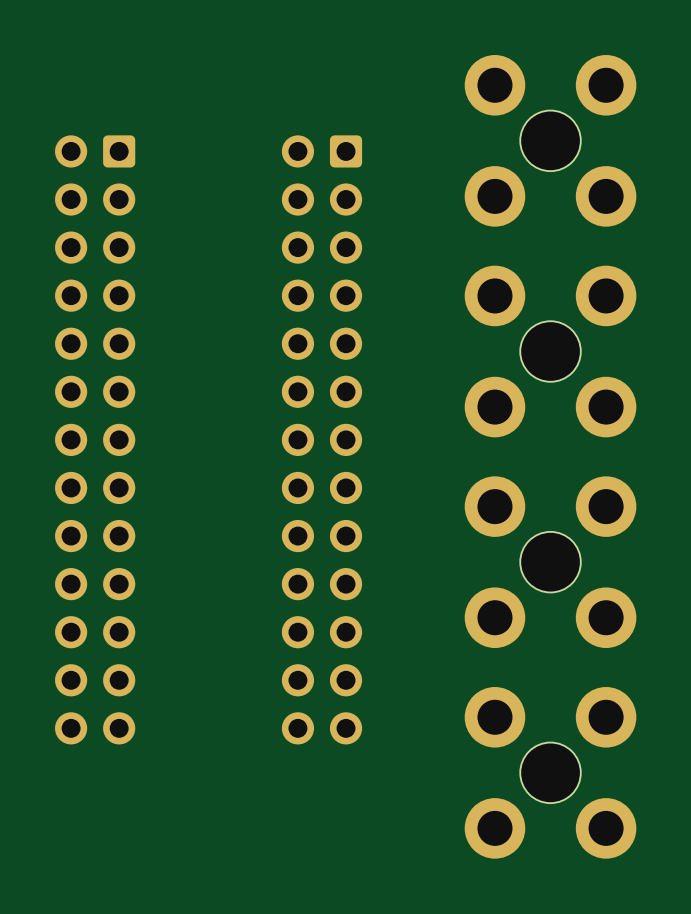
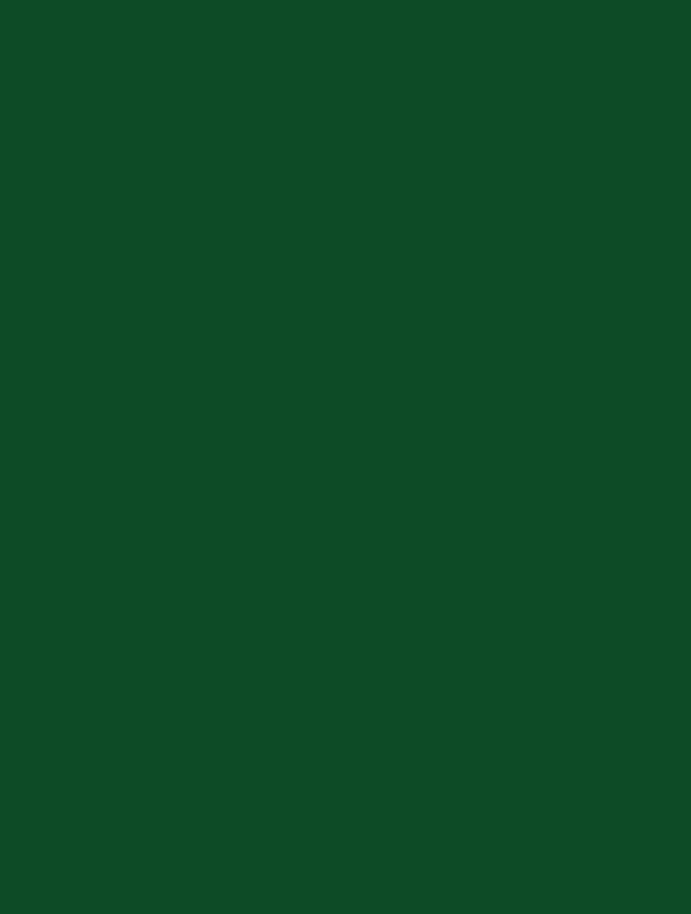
part: (550, 140) -> none
part: (550, 351) -> none
part: (95, 439) -> none
part: (321, 439) -> none
part: (550, 562) -> none
part: (550, 772) -> none

